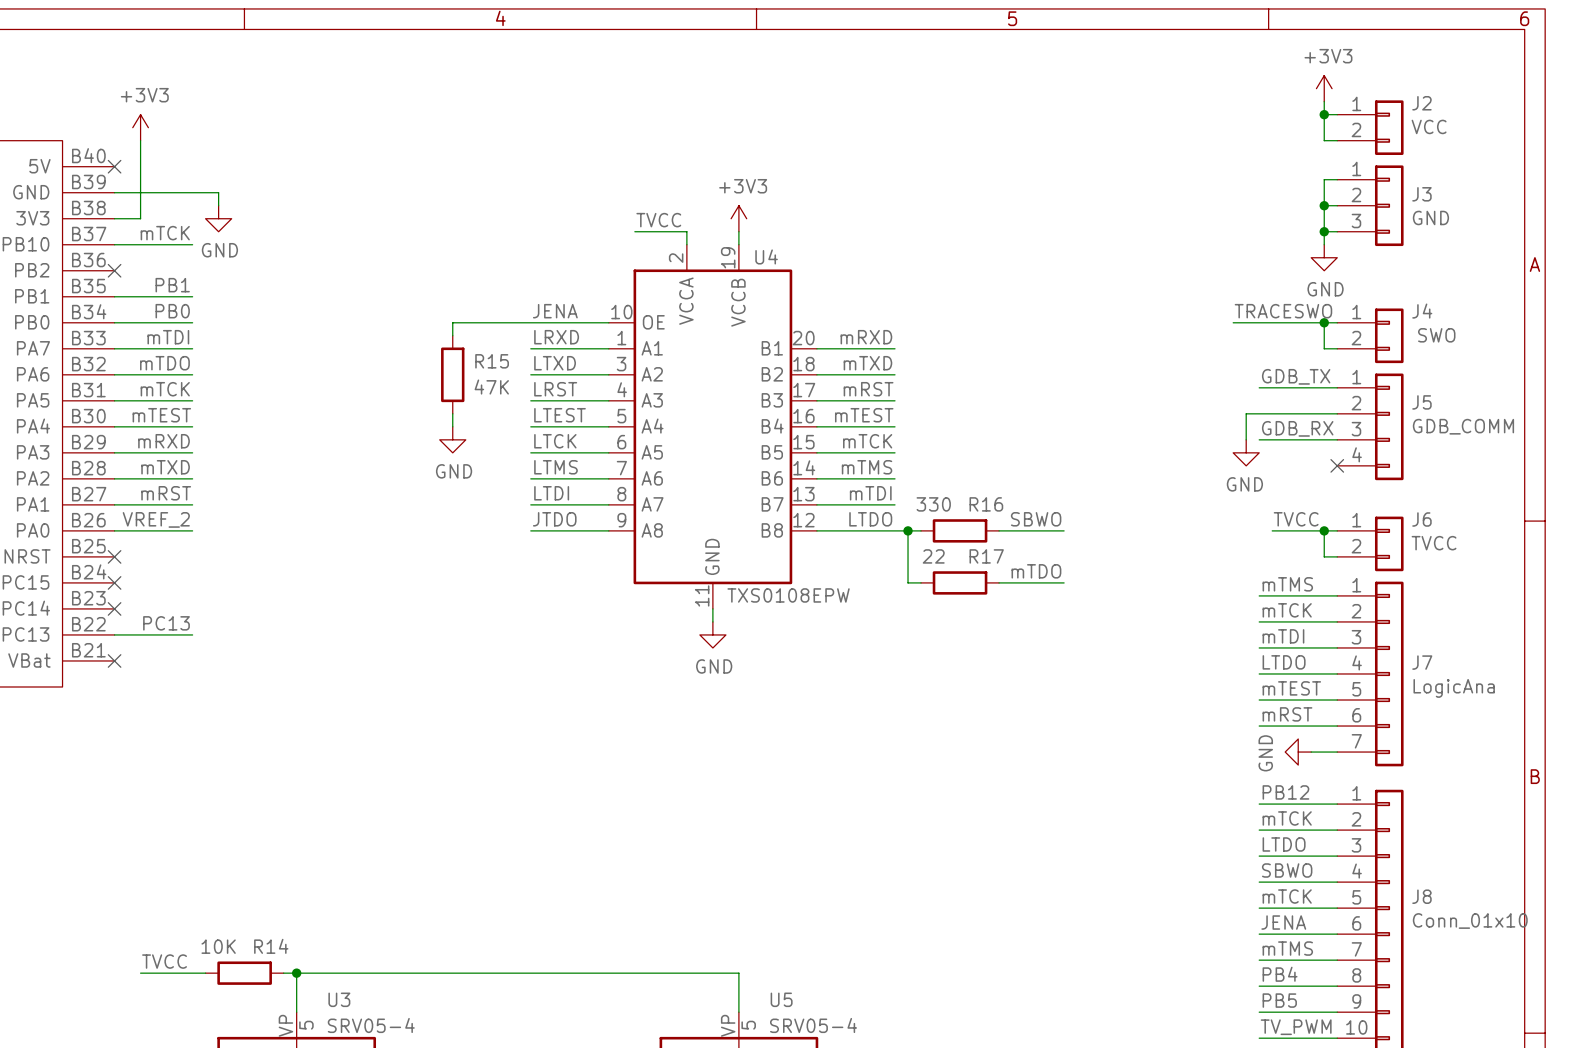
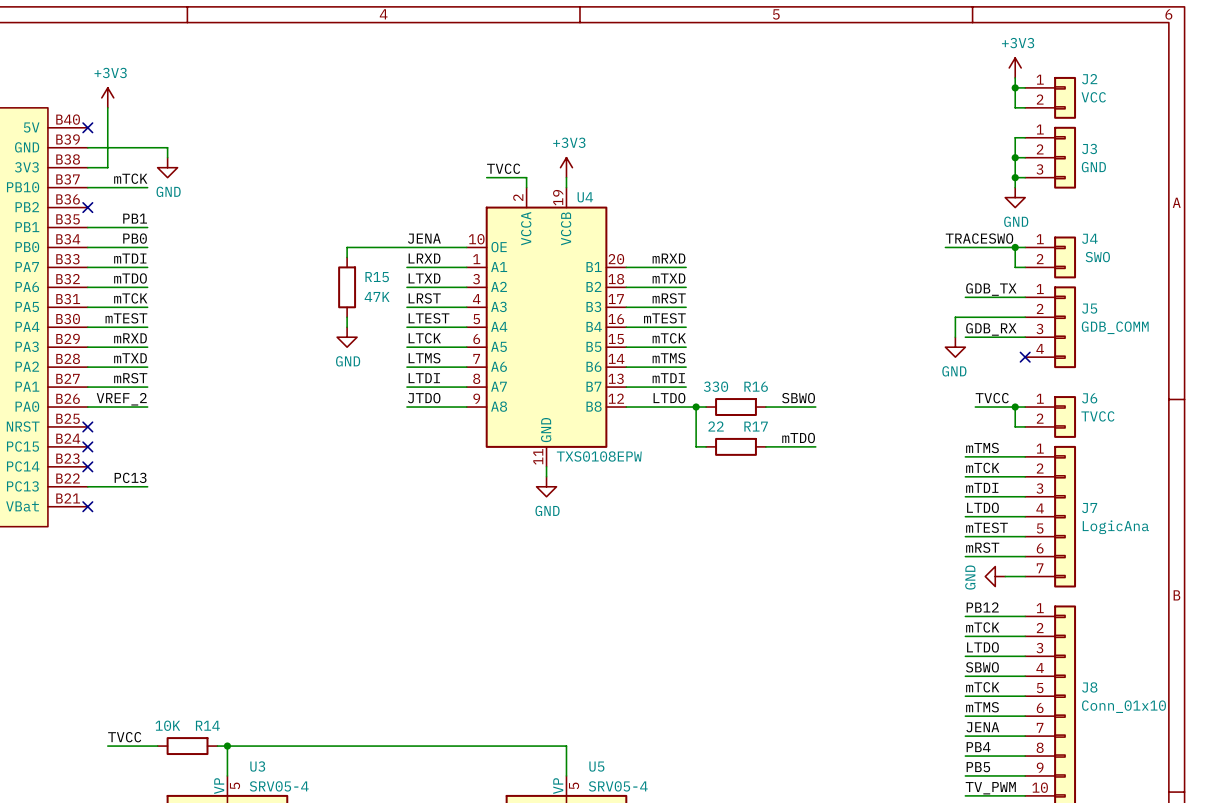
label: JENA (1283, 922) -> mTMS (982, 707)
label: mTMS (1287, 948) -> JENA (982, 727)

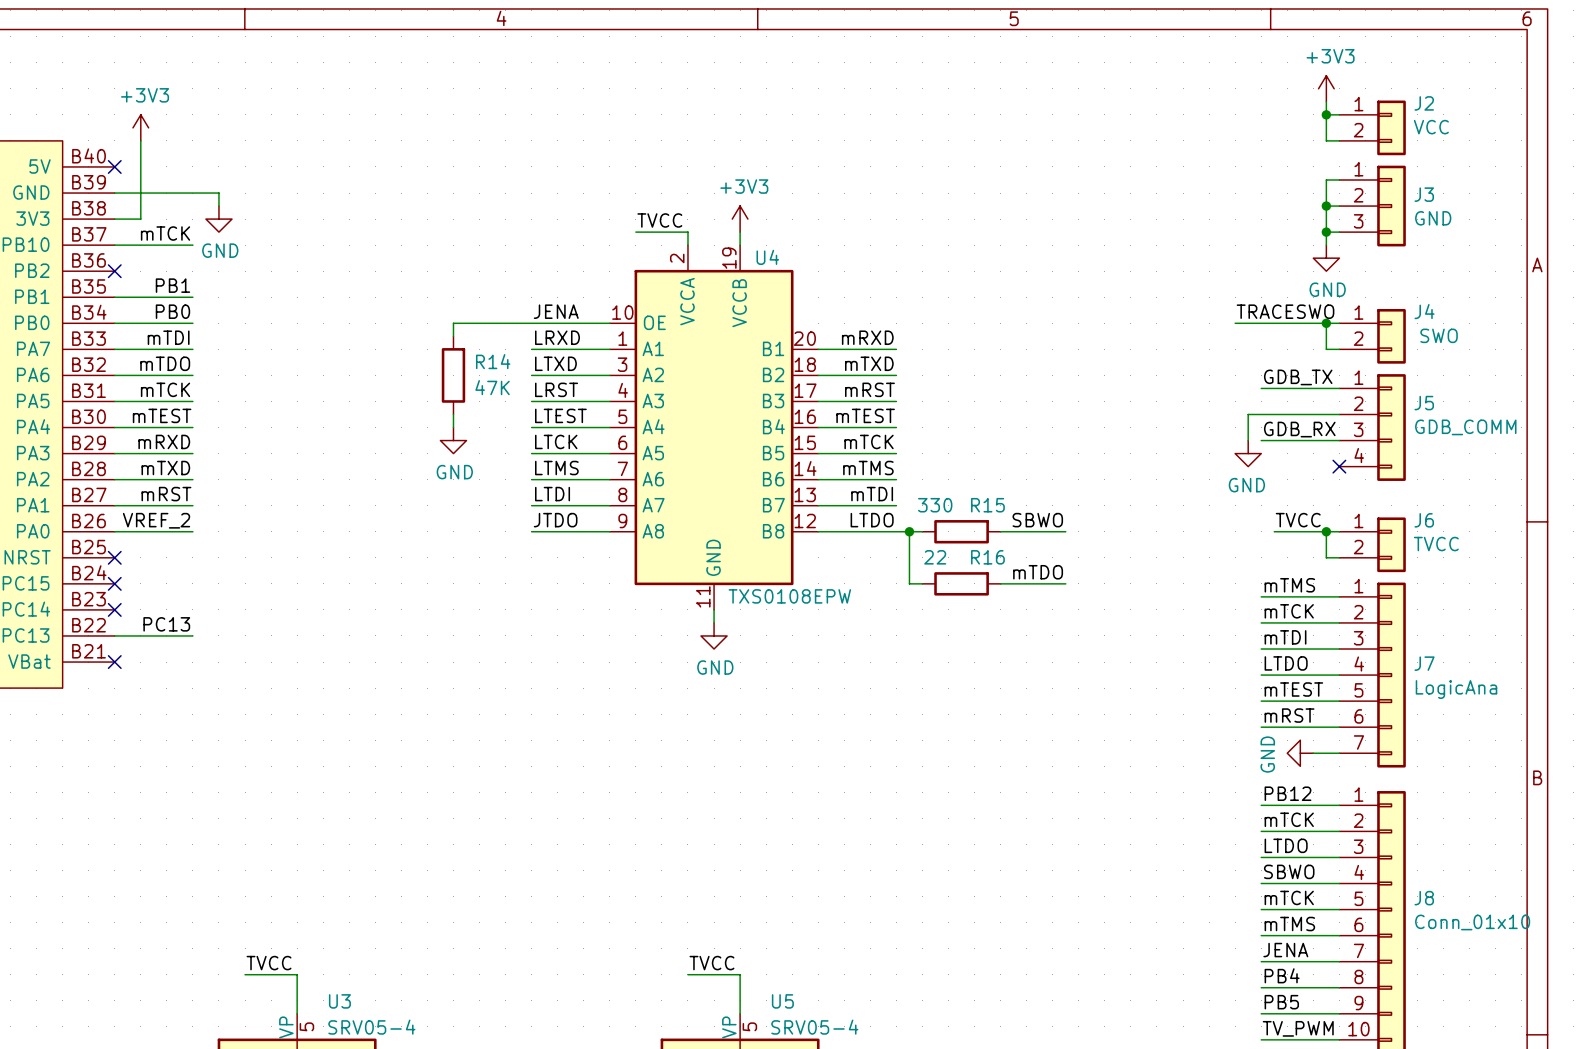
R15 name: R15 (377, 277) -> R14 (493, 361)
R16 name: R16 (756, 386) -> R15 (987, 505)
R17 name: R17 (756, 426) -> R16 (987, 557)
label position: TVCC (124, 737) -> TVCC (269, 963)
label: none -> TVCC (711, 963)
wire: (107, 746) (157, 746) -> none
wire: none -> (245, 974) (284, 974)
R14: 10K (187, 746) -> none
wire: (227, 746) (526, 746) -> none
junction: (227, 746) -> none

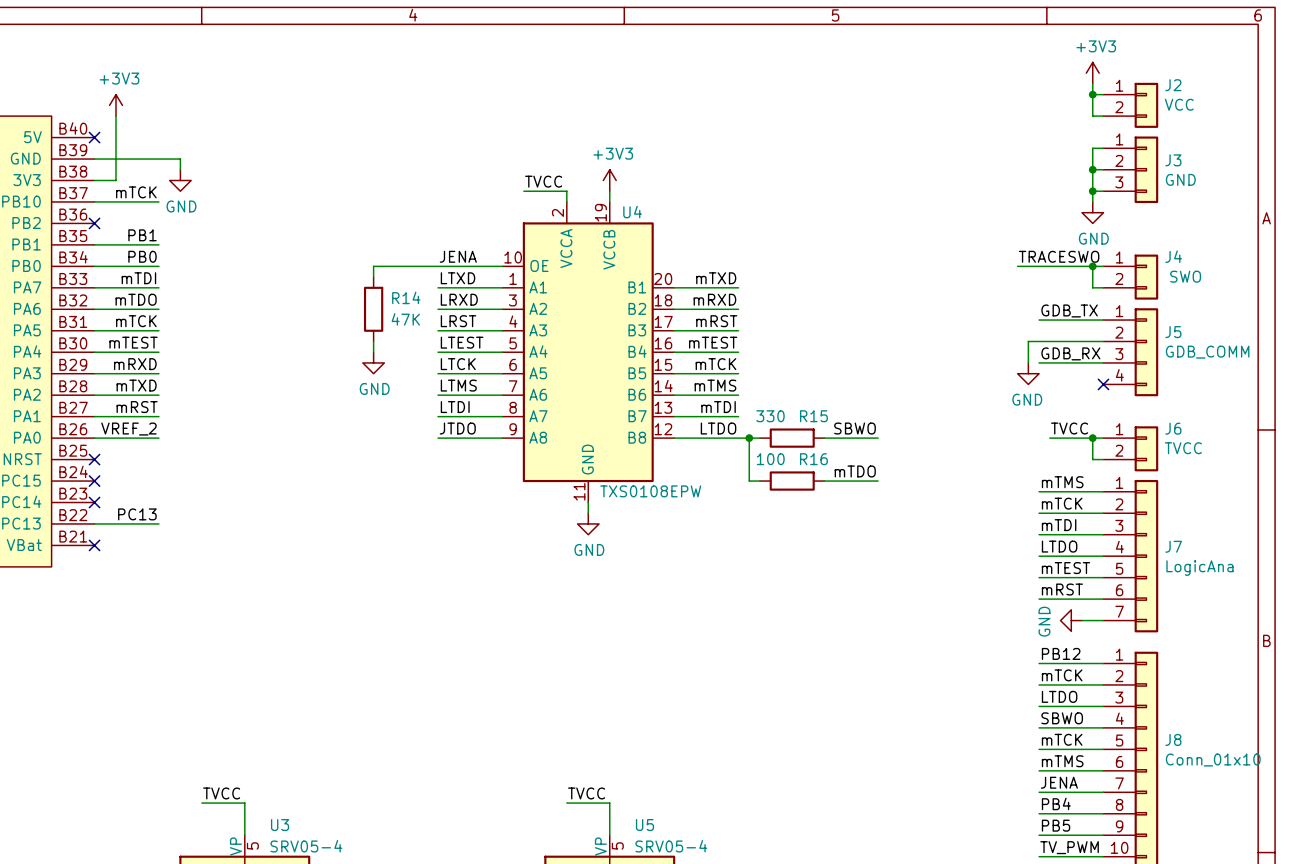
label: LRXD (557, 337) -> LTXD (458, 278)
label: mRXD (867, 337) -> mTXD (716, 278)
label: LTXD (555, 363) -> LRXD (459, 299)
label: mTXD (869, 363) -> mRXD (714, 299)
R16 value: 22 (935, 557) -> 100 (770, 459)

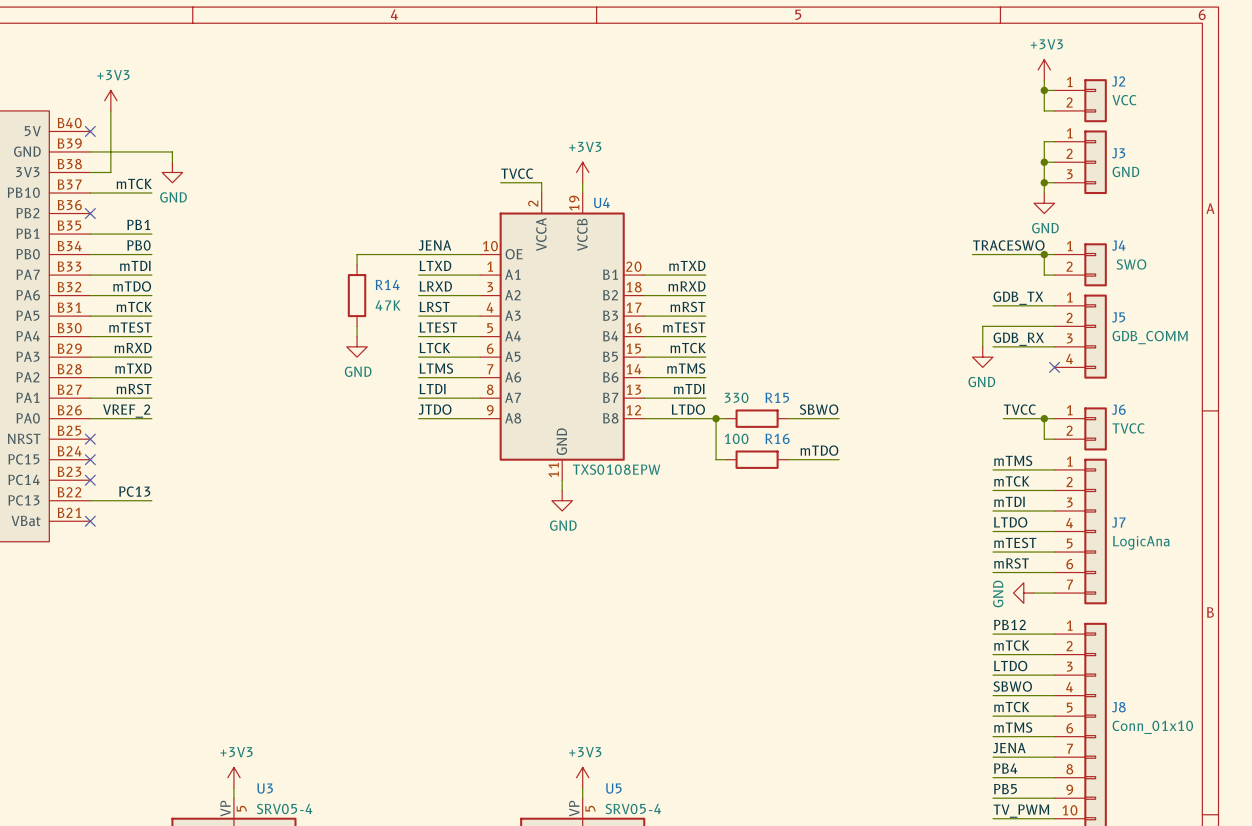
label: TVCC (221, 793) -> none
label: TVCC (586, 793) -> none
wire: (201, 803) (244, 803) (244, 824) -> none
wire: (566, 803) (609, 803) (609, 824) -> none
power symbol: none -> +3V3 (233, 777)
power symbol: none -> +3V3 (582, 777)

